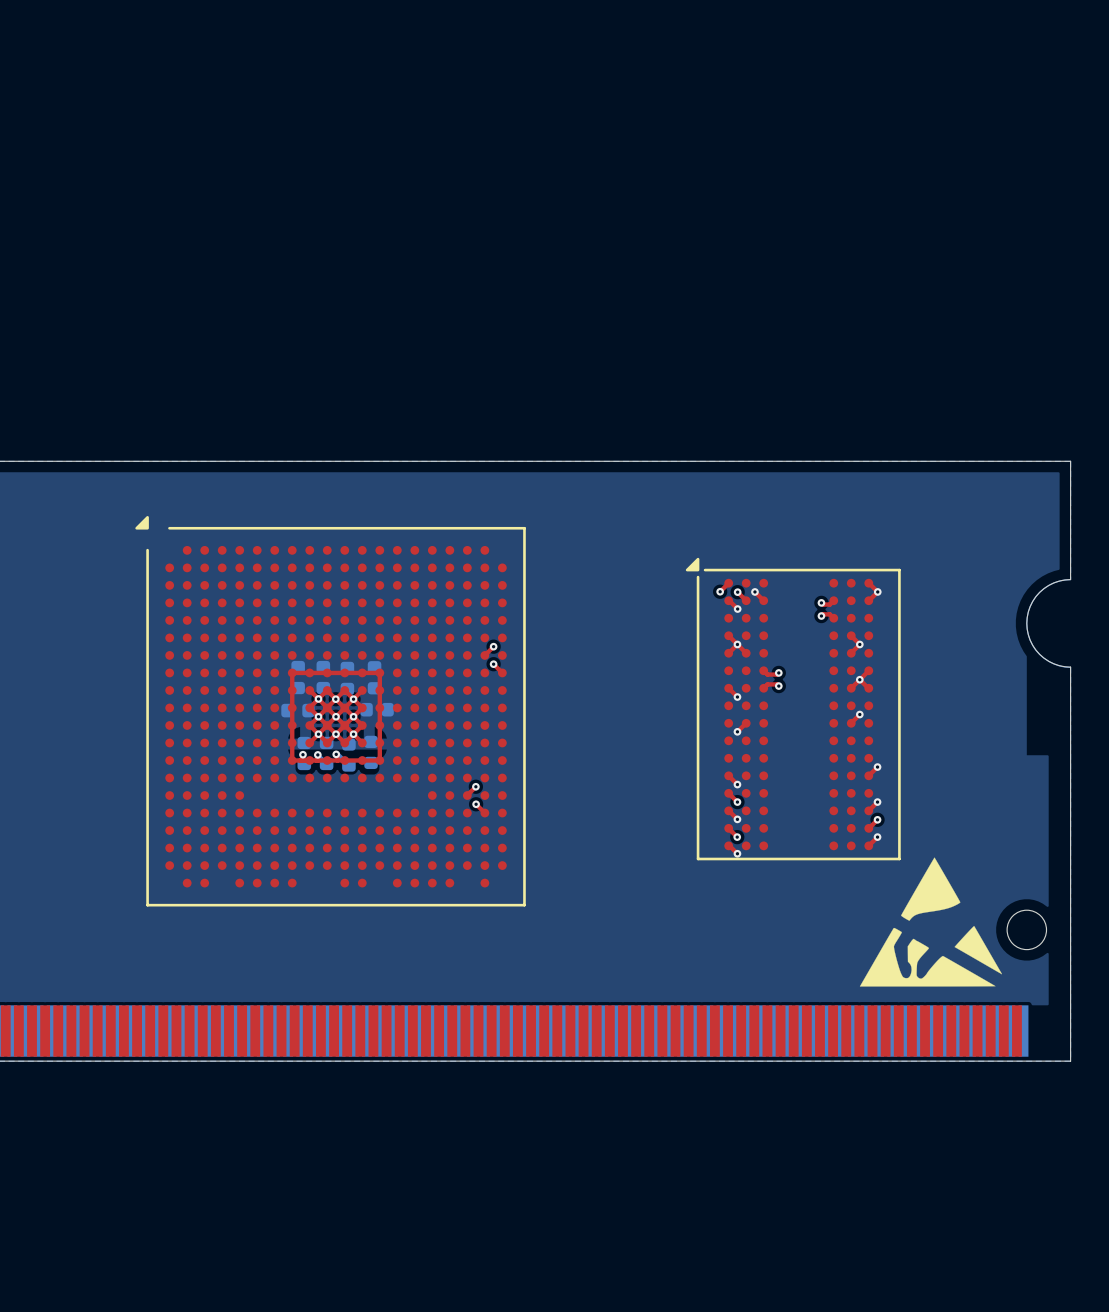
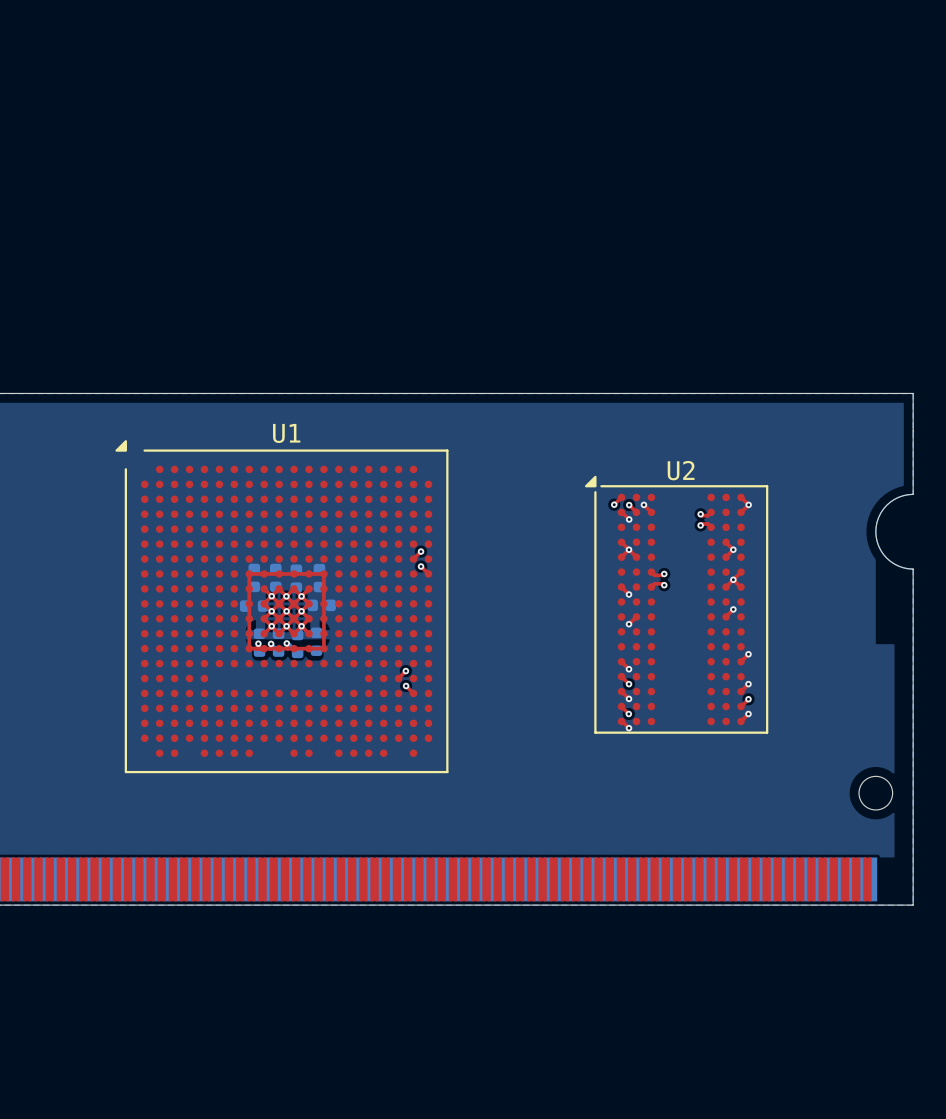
U1 name: none -> U1 (286, 433)
U2 name: none -> U2 (681, 470)
drawing: [859, 857, 1003, 987] -> none

